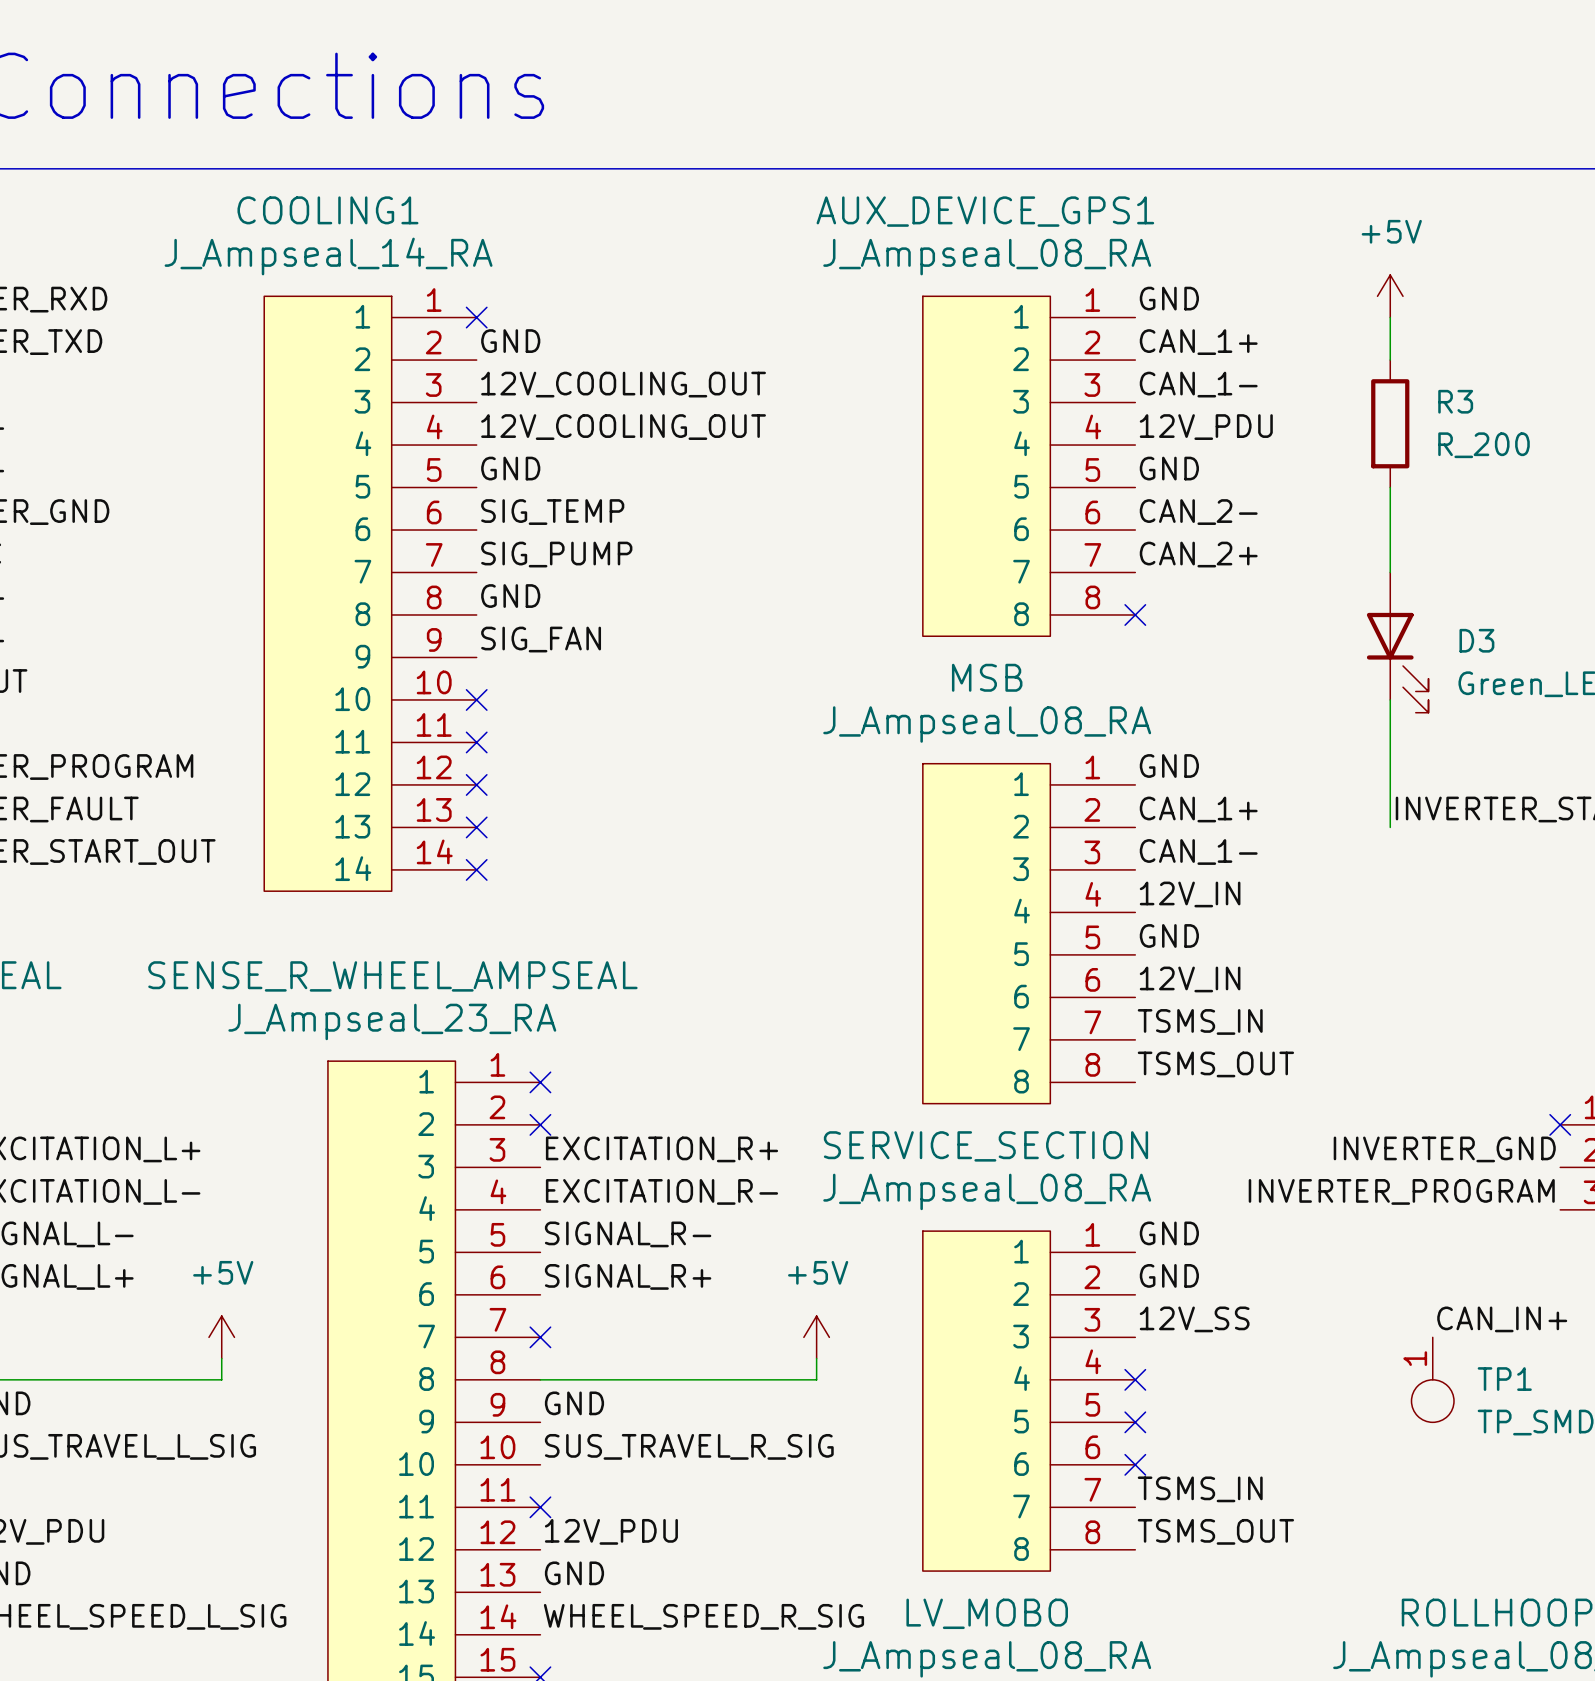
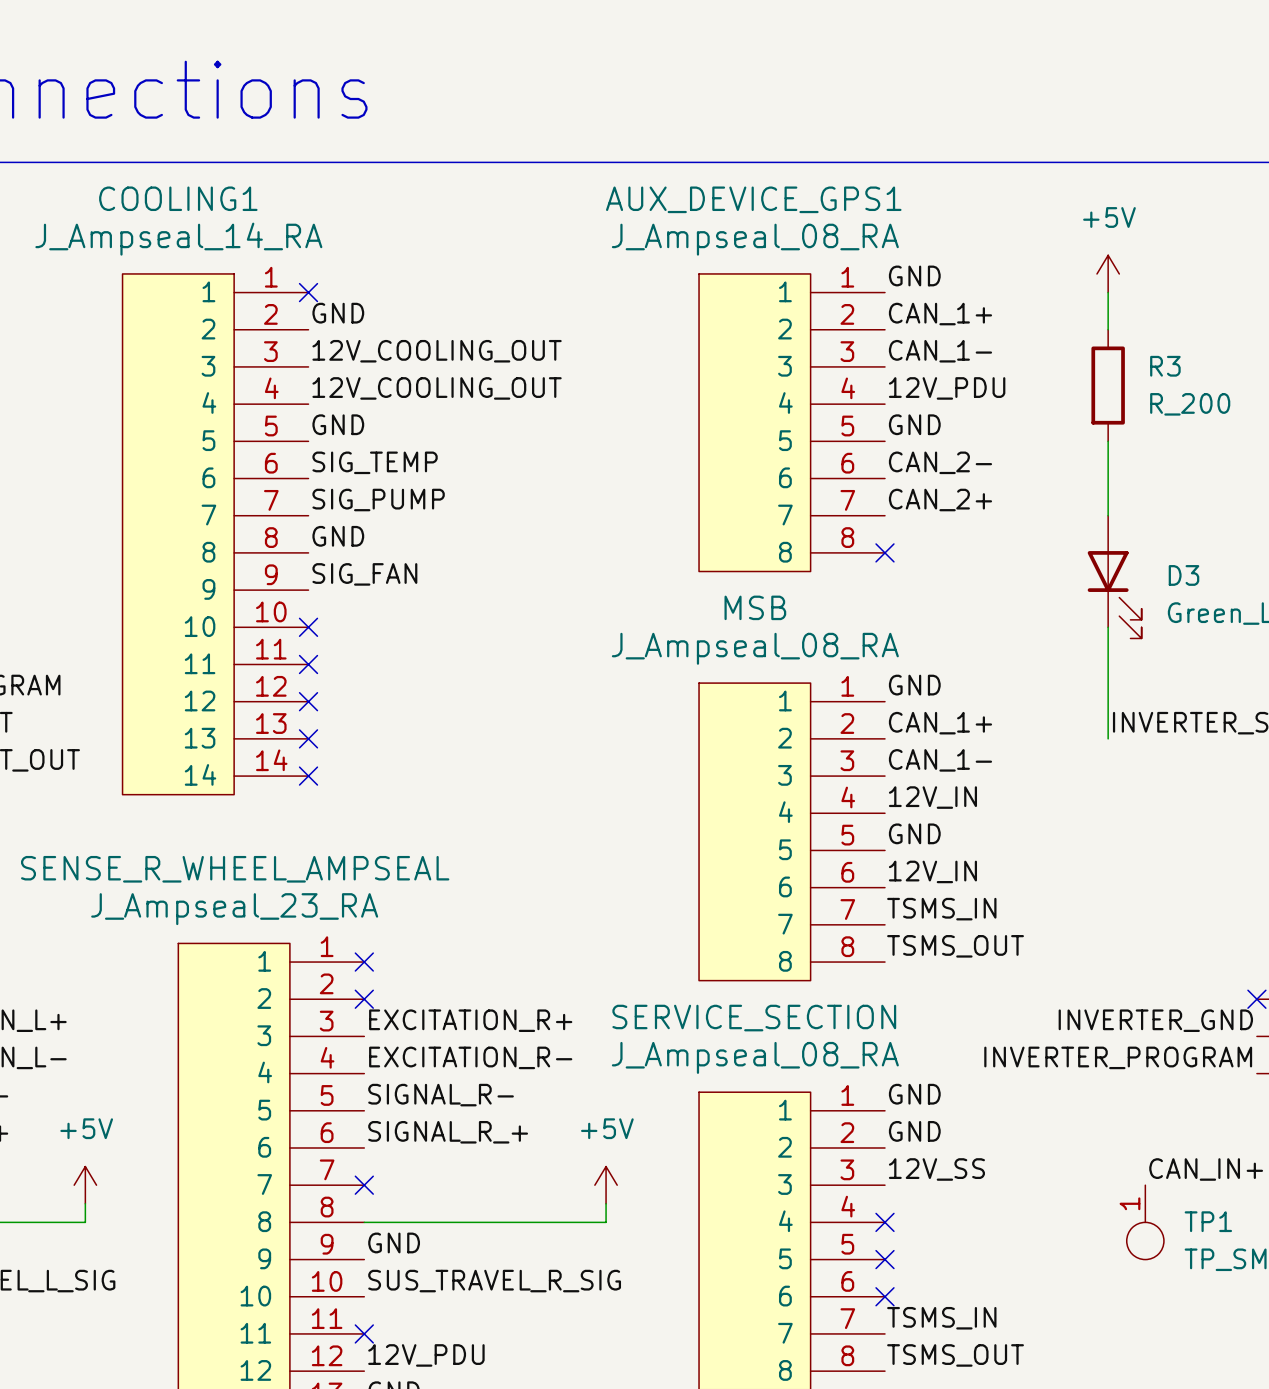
label: SIGNAL_R+ (628, 1276) -> SIGNAL_R_+ (448, 1132)

